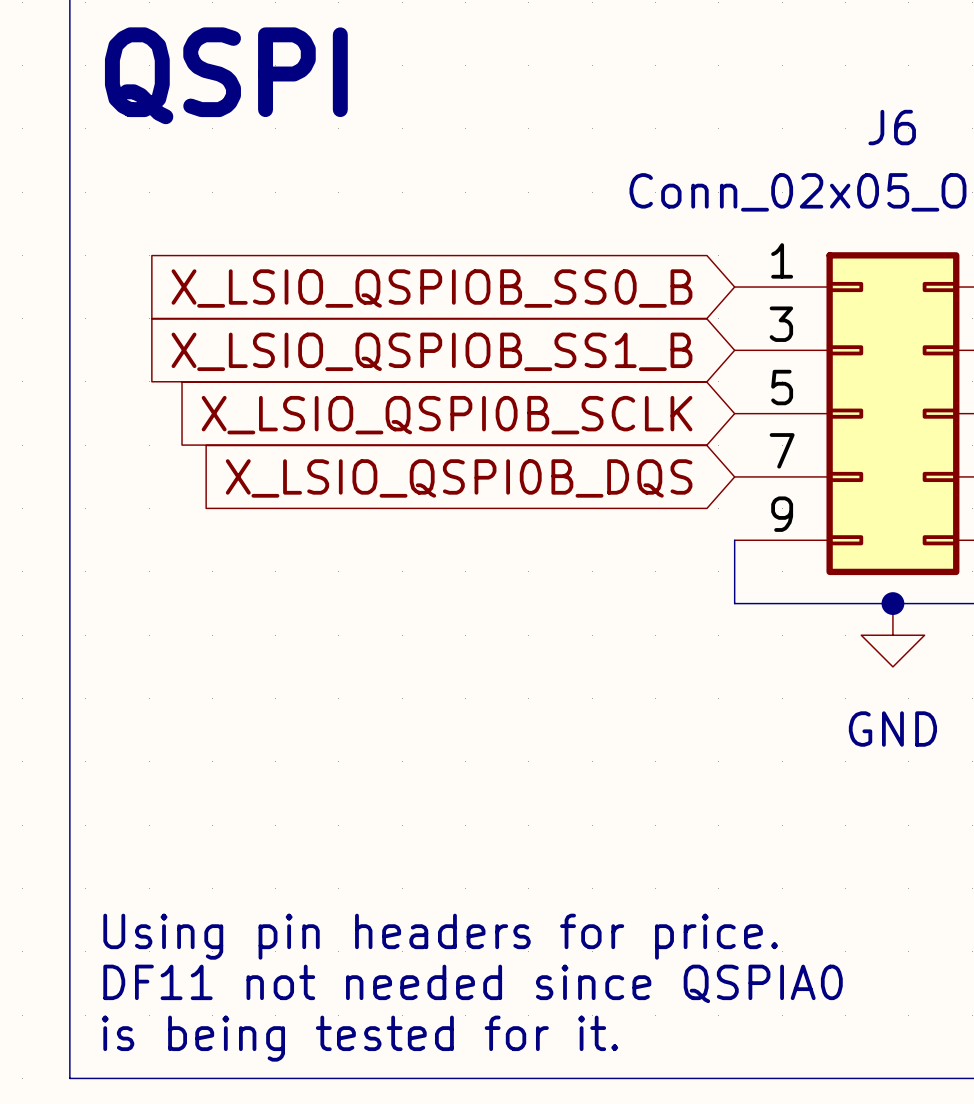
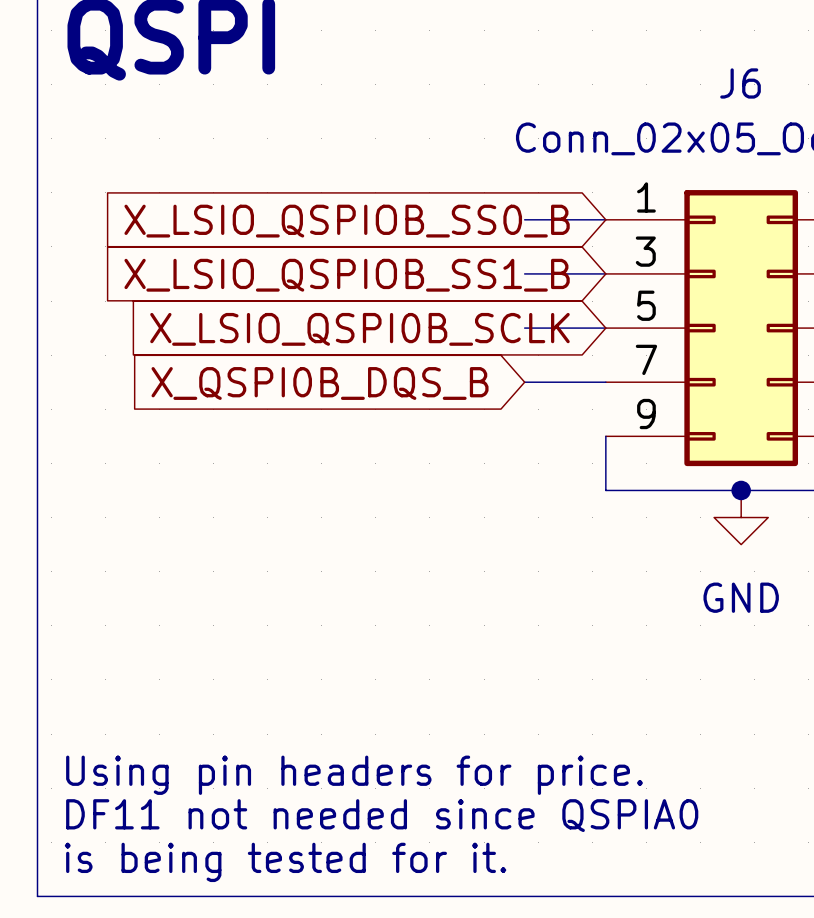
wire: none -> (524, 219) (605, 219)
wire: none -> (524, 273) (605, 273)
wire: none -> (524, 328) (605, 328)
wire: none -> (524, 382) (605, 382)
global label: X_LSIO_QSPI0B_DQS (459, 478) -> X_QSPI0B_DQS_B (320, 383)

